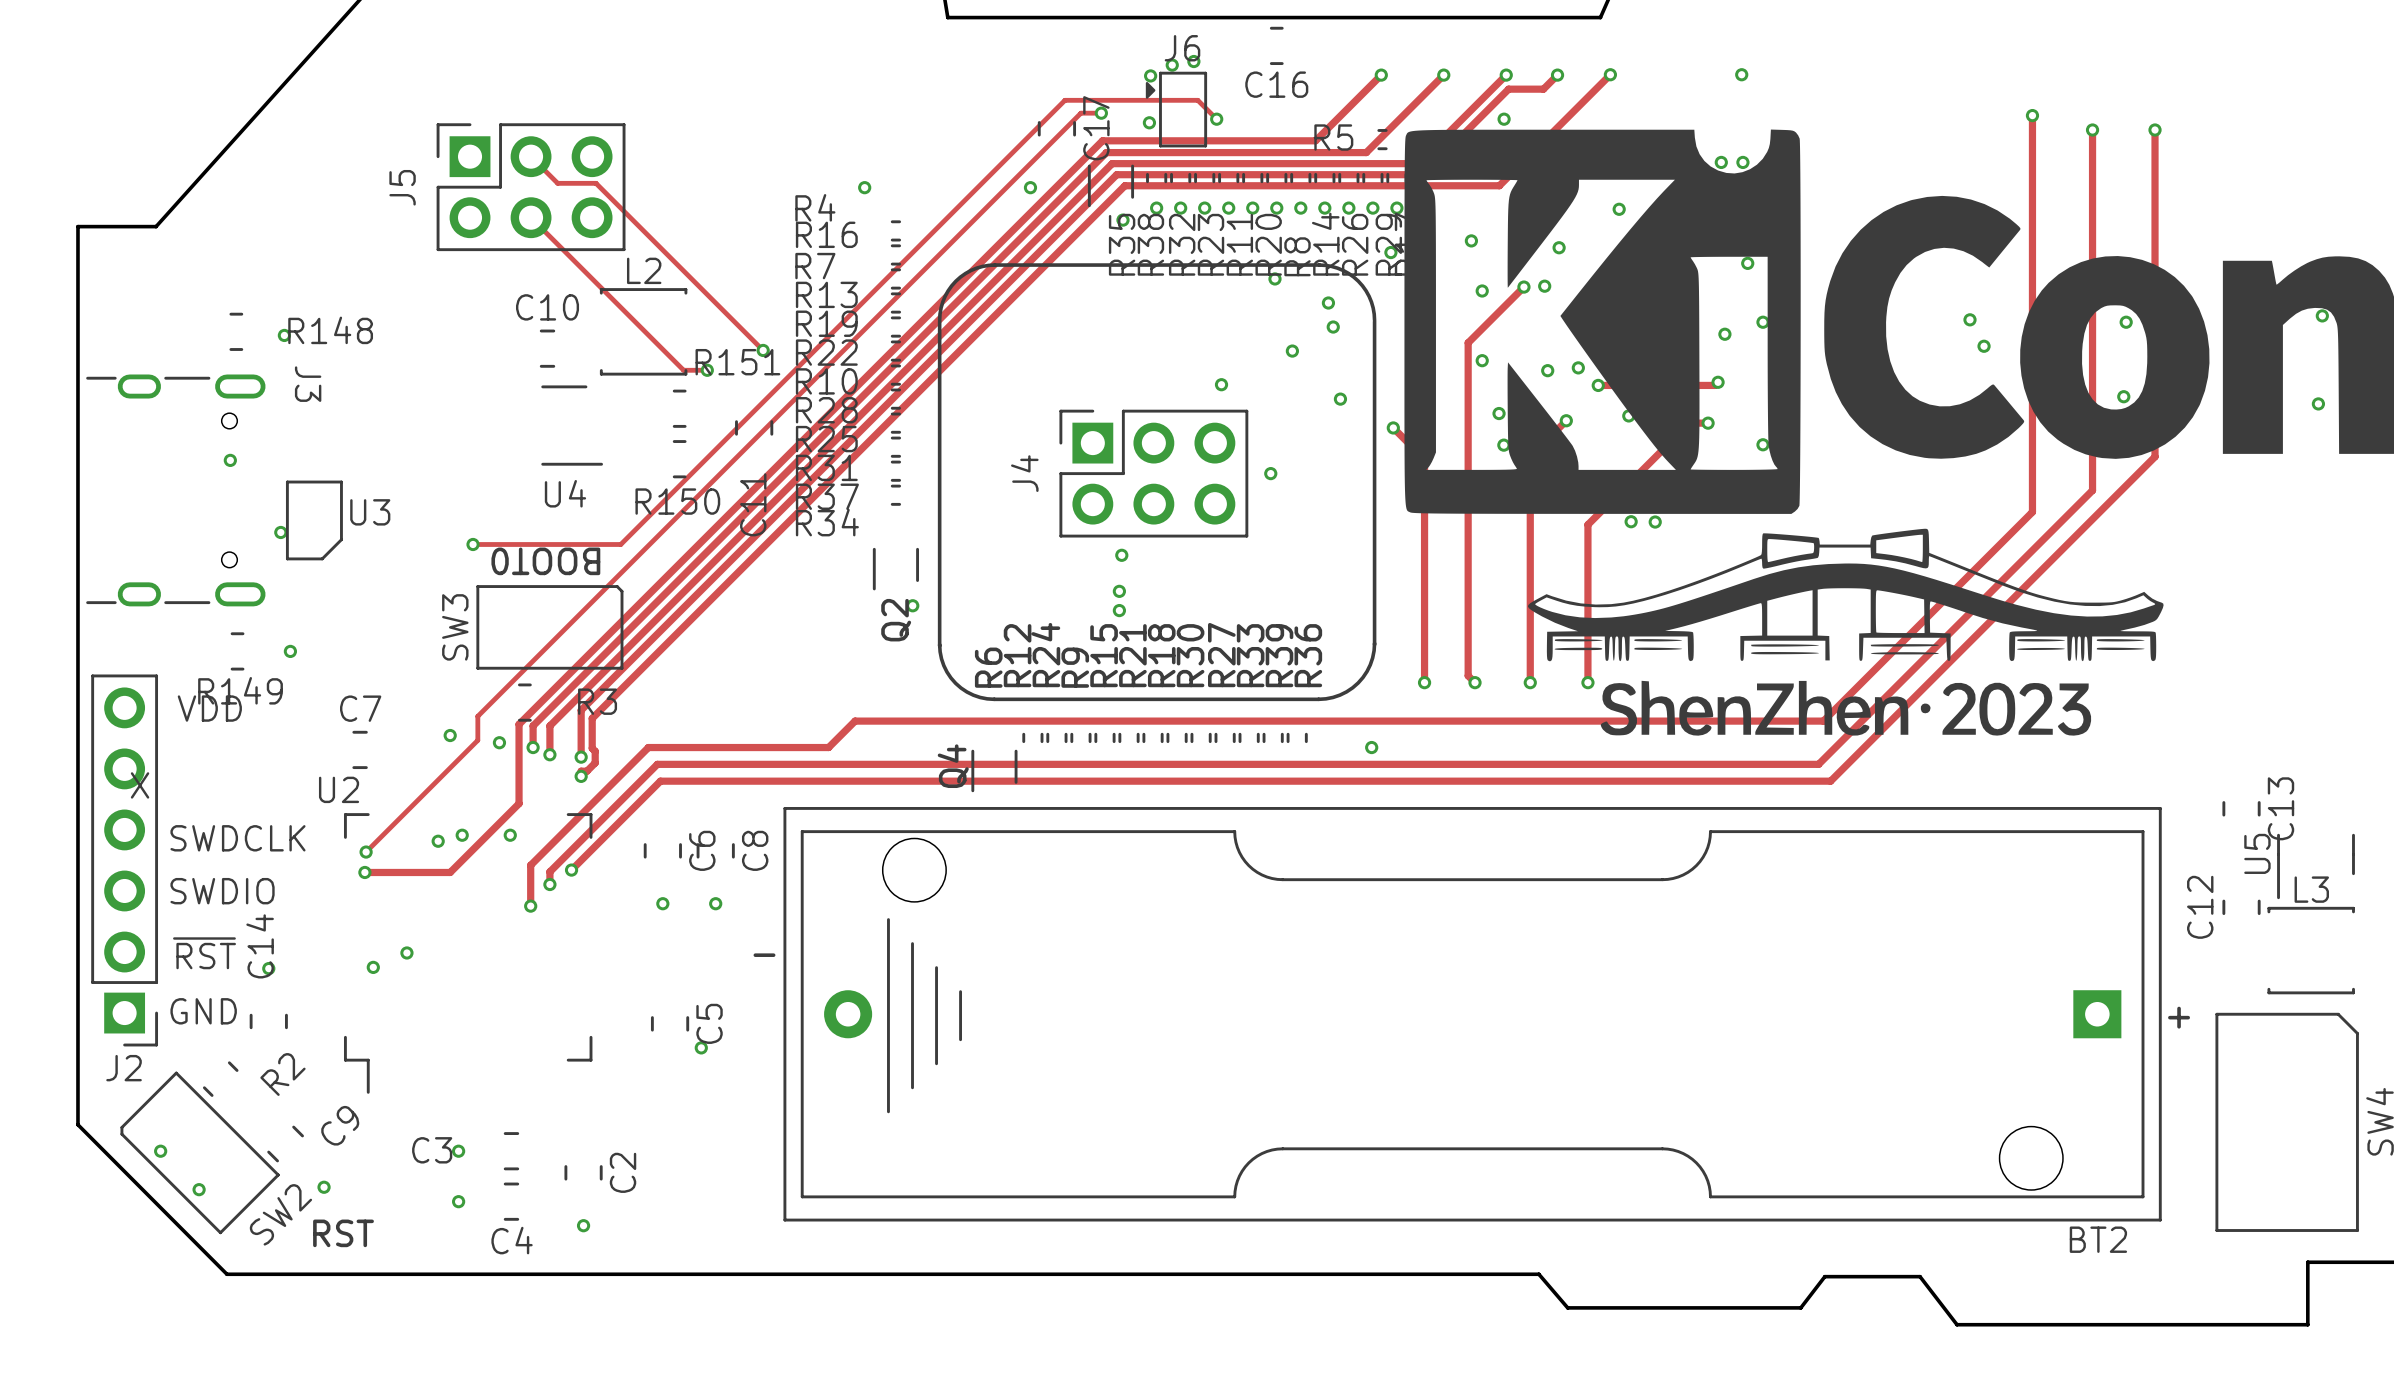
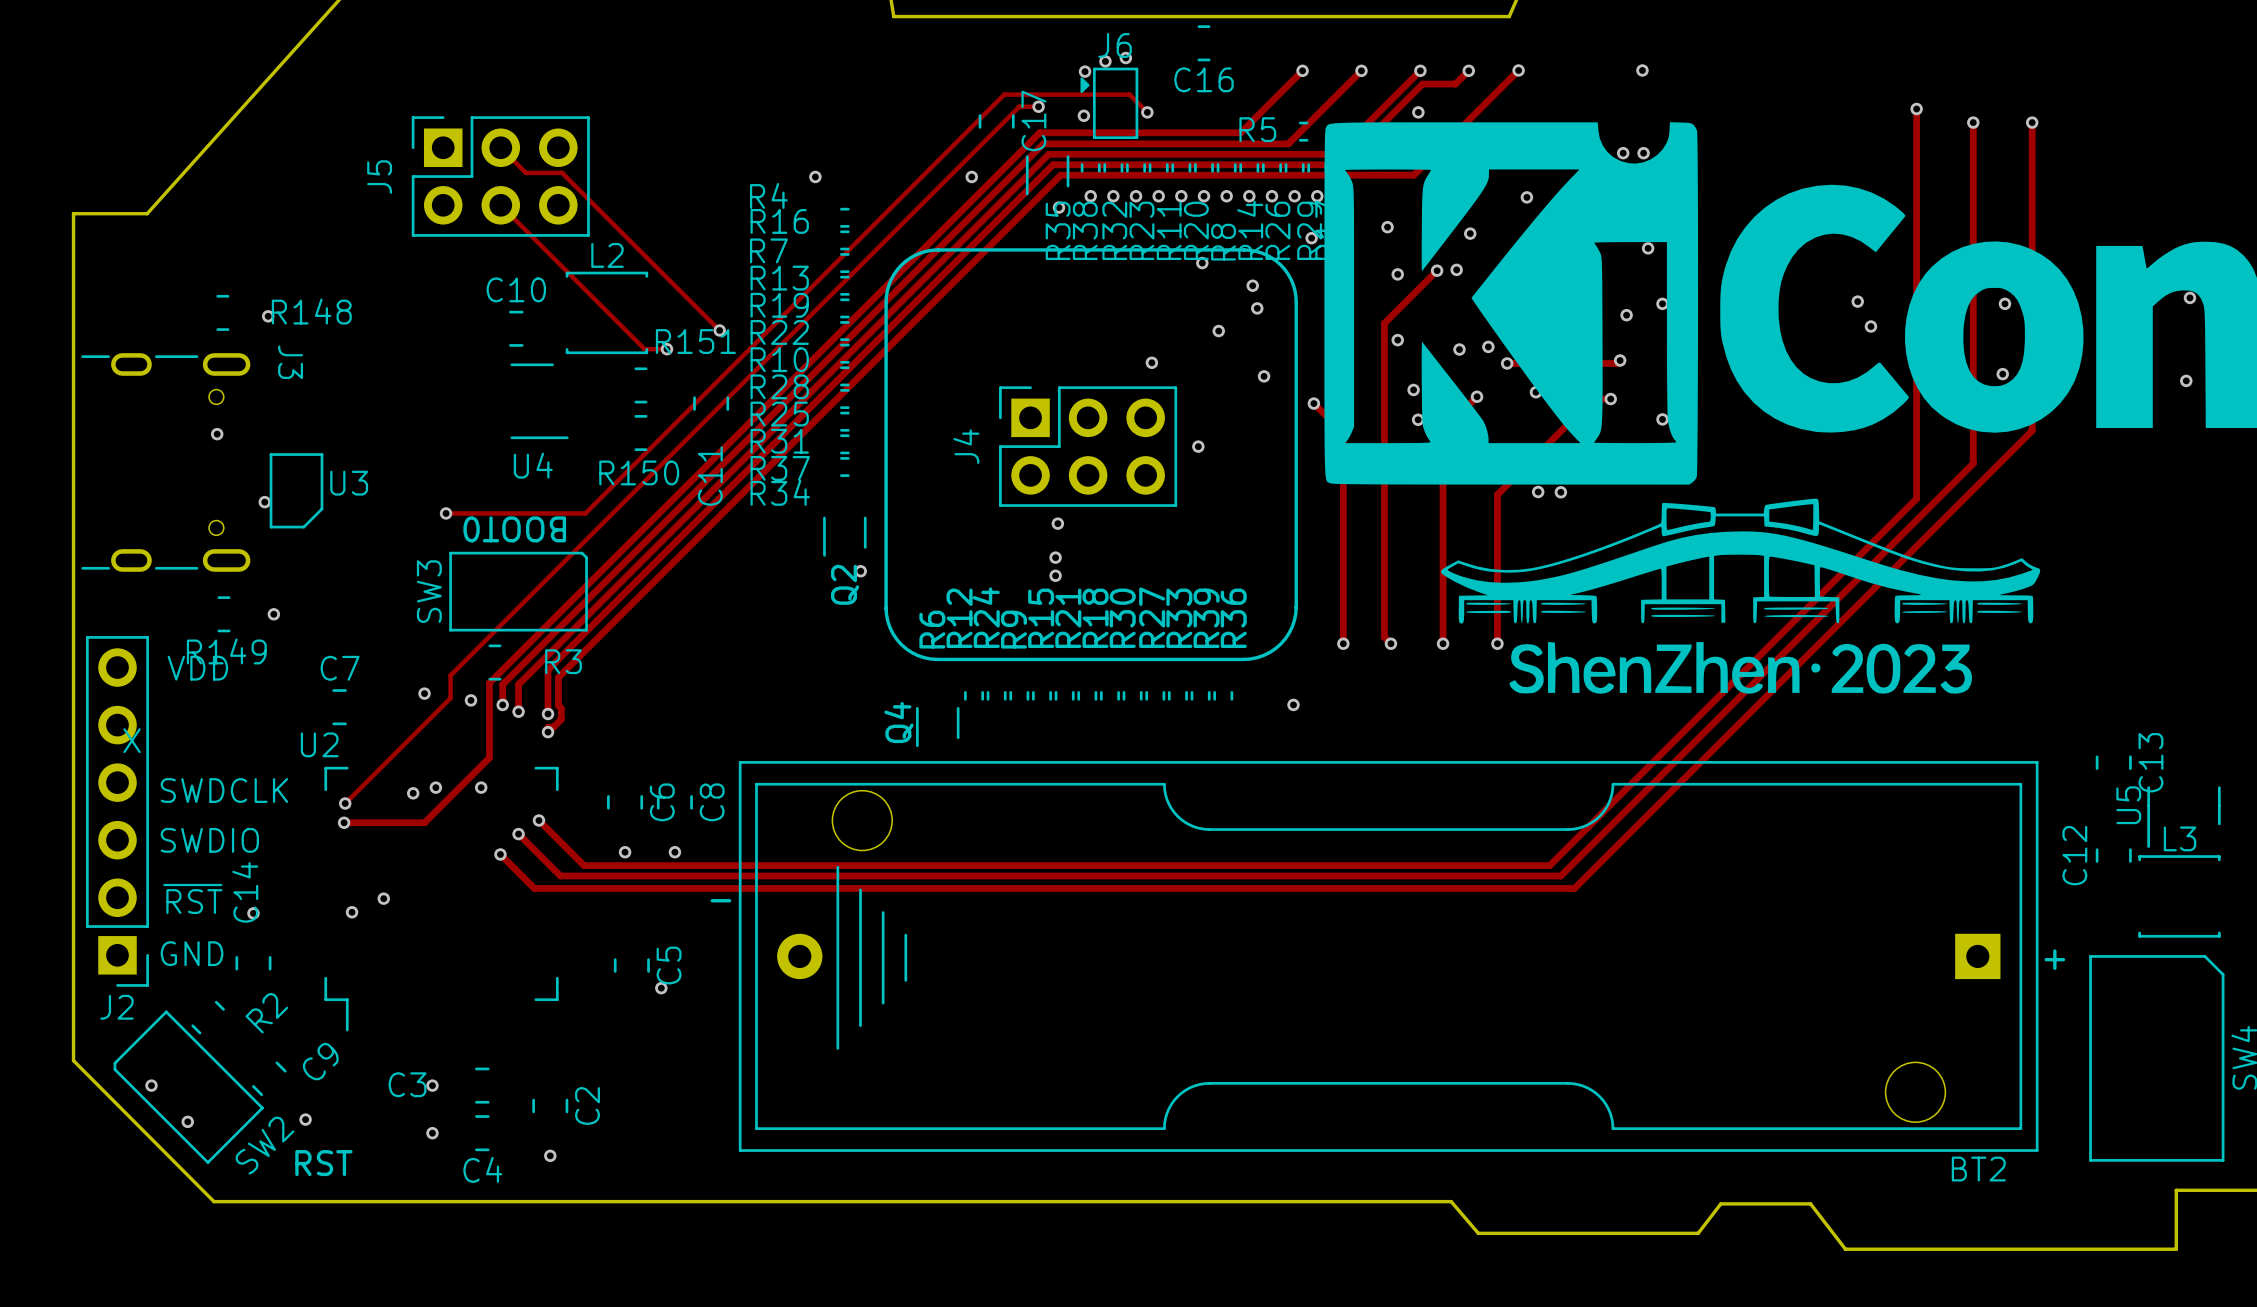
track: (2092, 490) (1818, 764) (657, 764) (549, 871) (549, 884) -> (1973, 462) (1560, 876) (560, 876) (518, 834)
track: (2032, 512) (1823, 721) (855, 721) (828, 747) (648, 747) (530, 865) (530, 906) -> (1916, 482) (1916, 498) (1549, 865) (584, 865) (538, 820)
track: (1830, 781) (660, 781) (571, 870) -> (1726, 736) (1574, 888) (534, 888) (500, 854)

